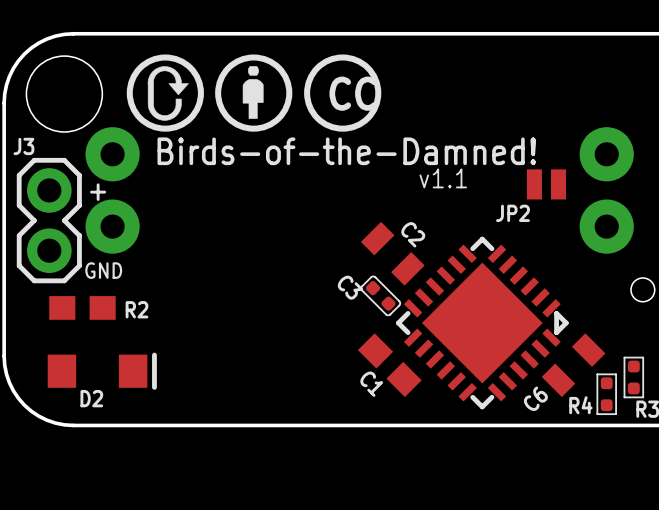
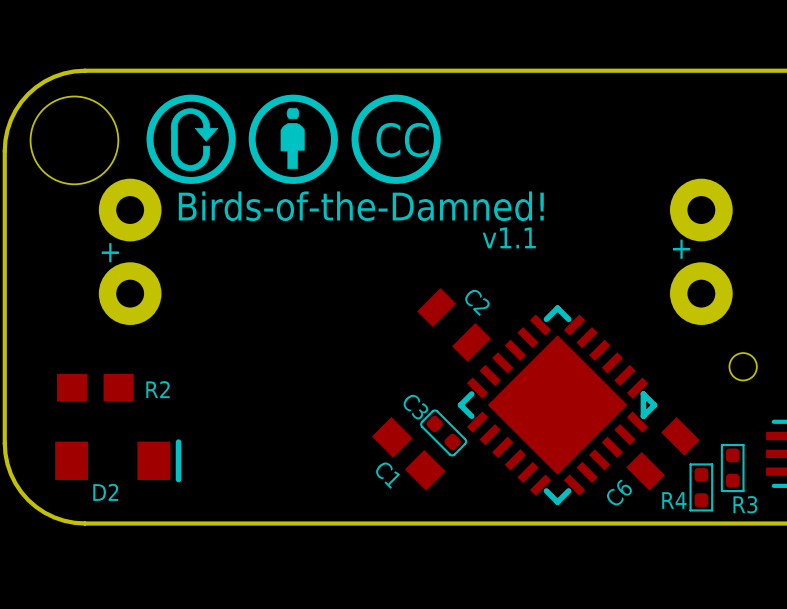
JP2: (546, 184) -> none
text: none -> + (681, 249)
J3: (49, 220) -> none
text: GND (103, 270) -> none
C3 name position: C3 (350, 287) -> C3 (415, 407)
C3 position: (380, 295) -> (443, 432)
C1 position: (389, 365) -> (408, 453)

